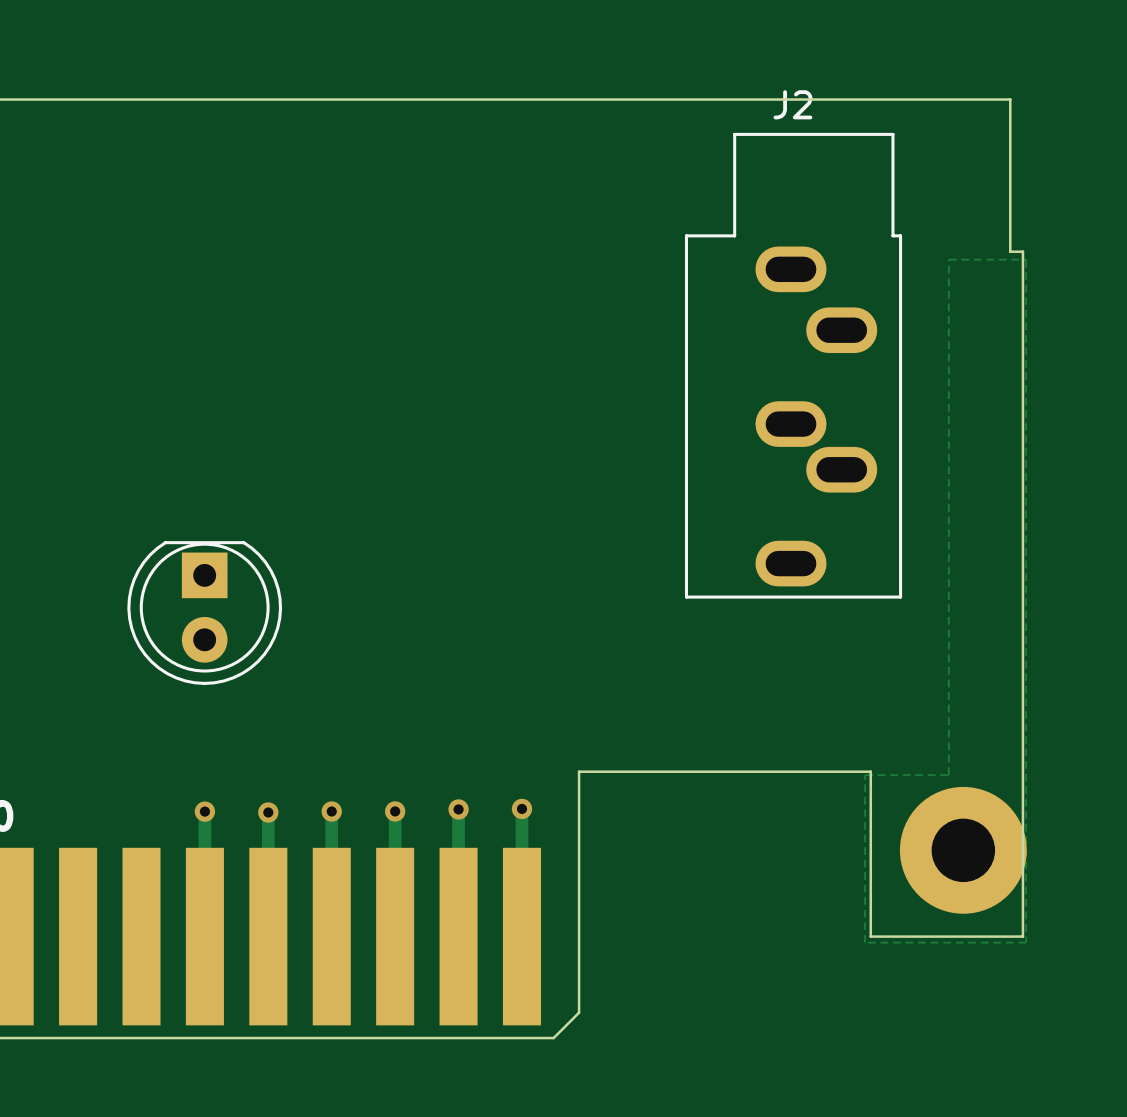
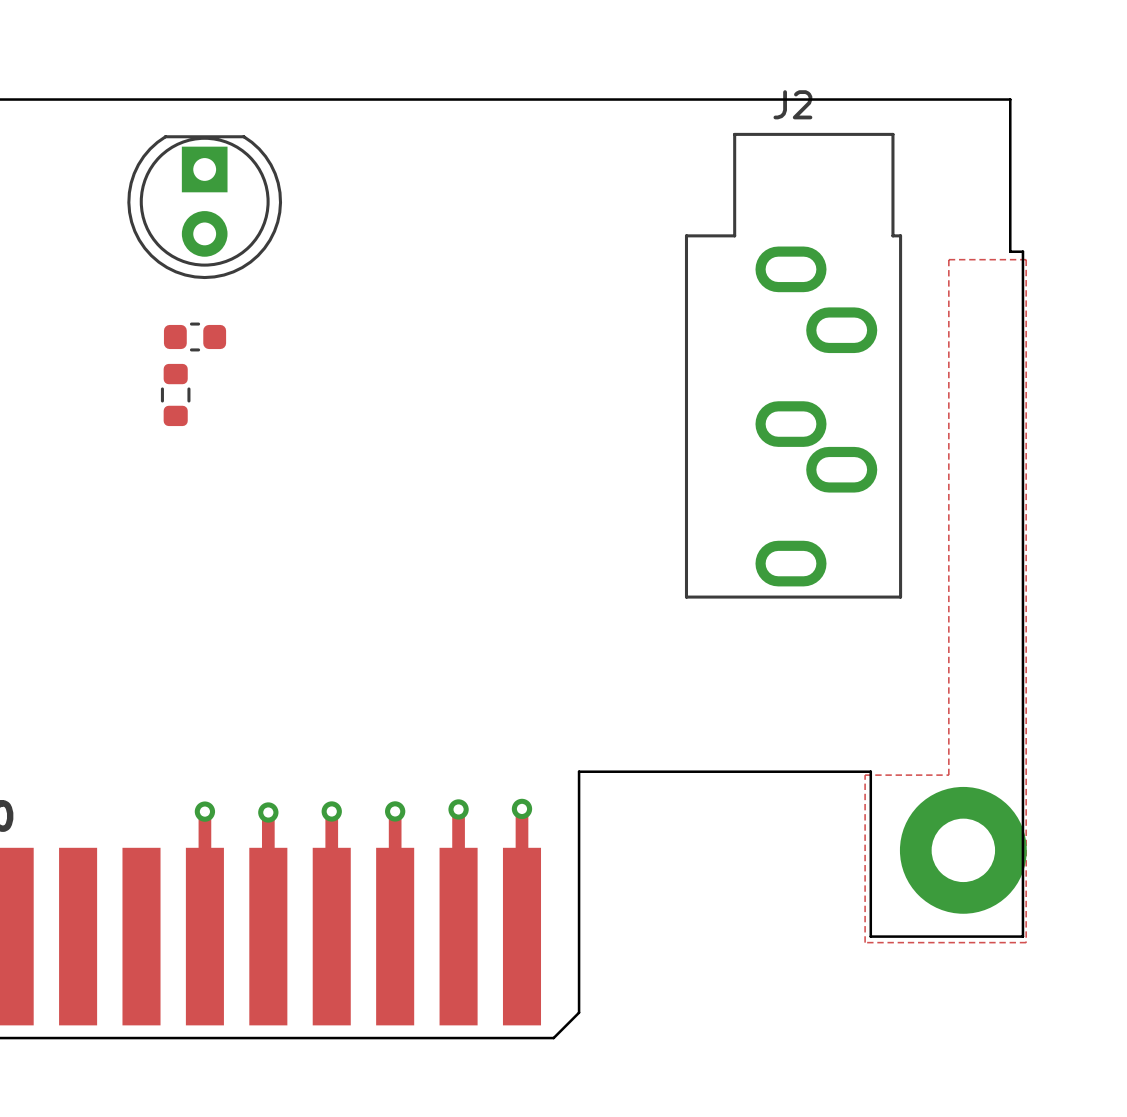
part: none -> (195, 336)
part: none -> (175, 394)
part position: (204, 613) -> (204, 207)

